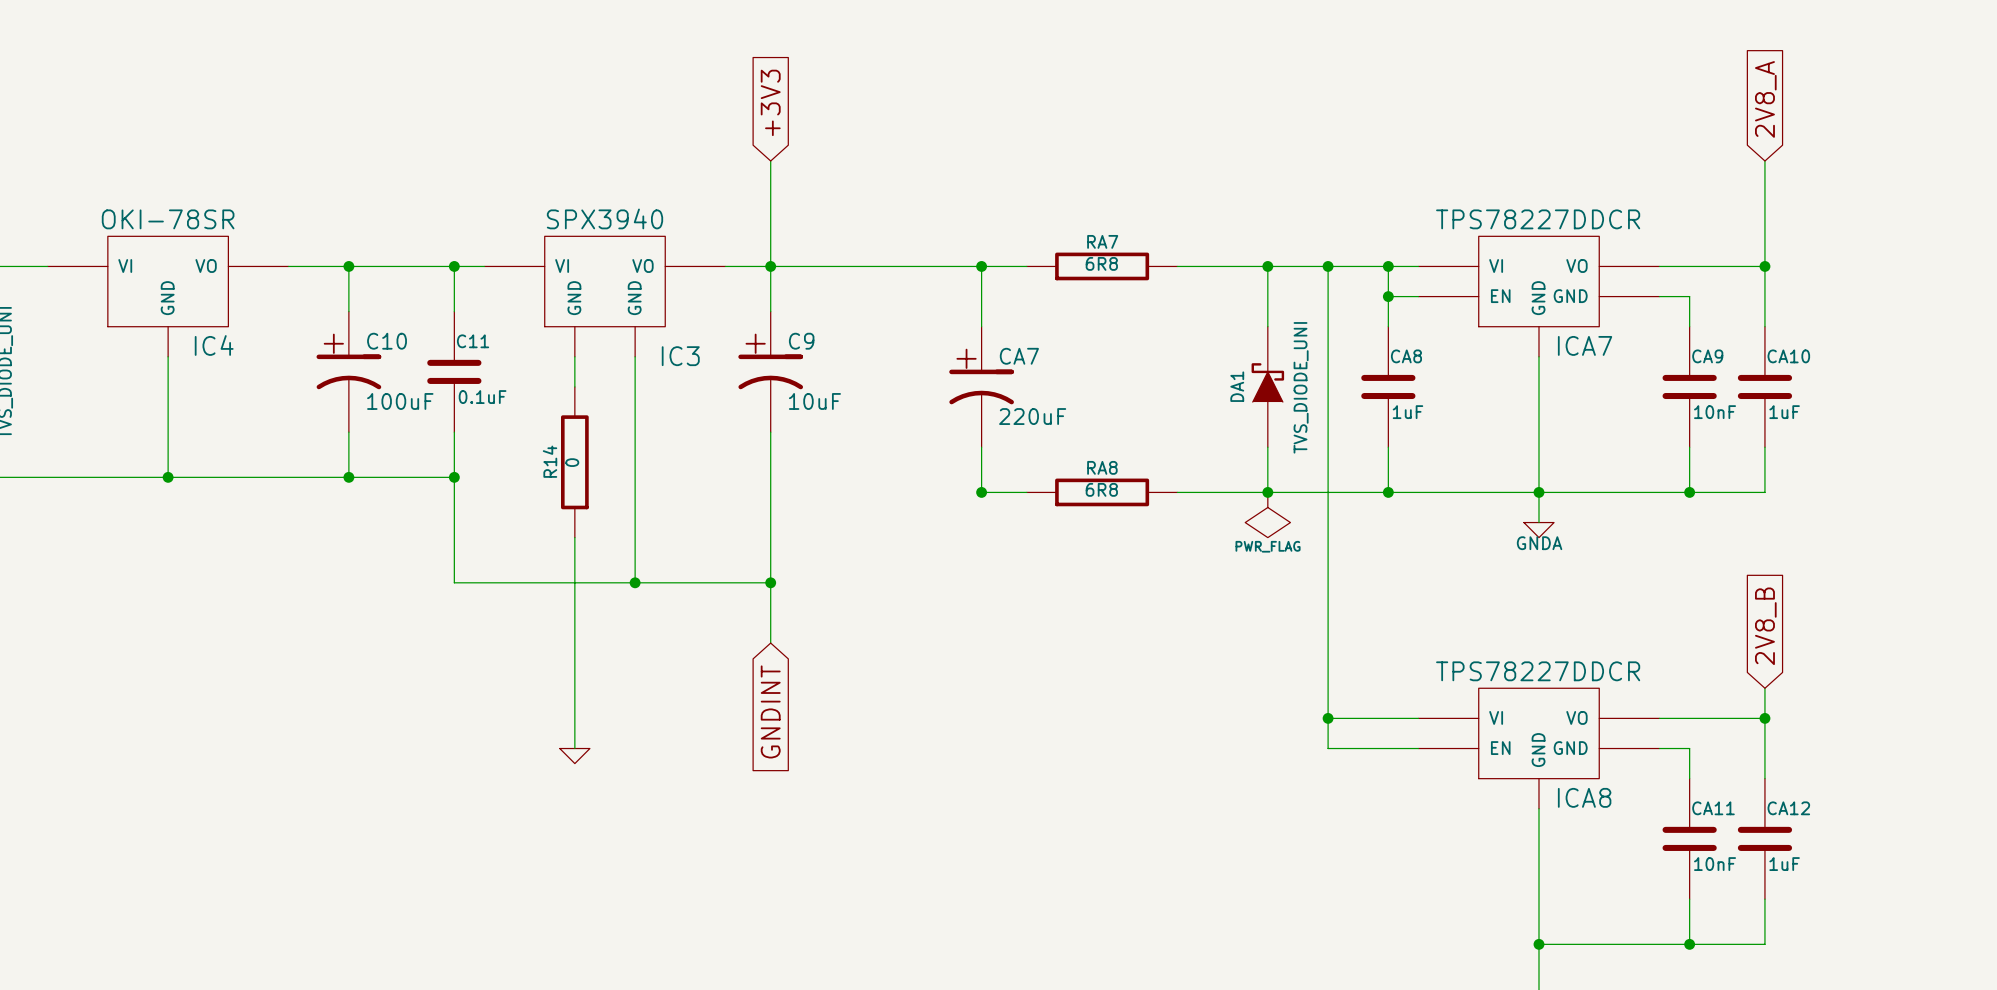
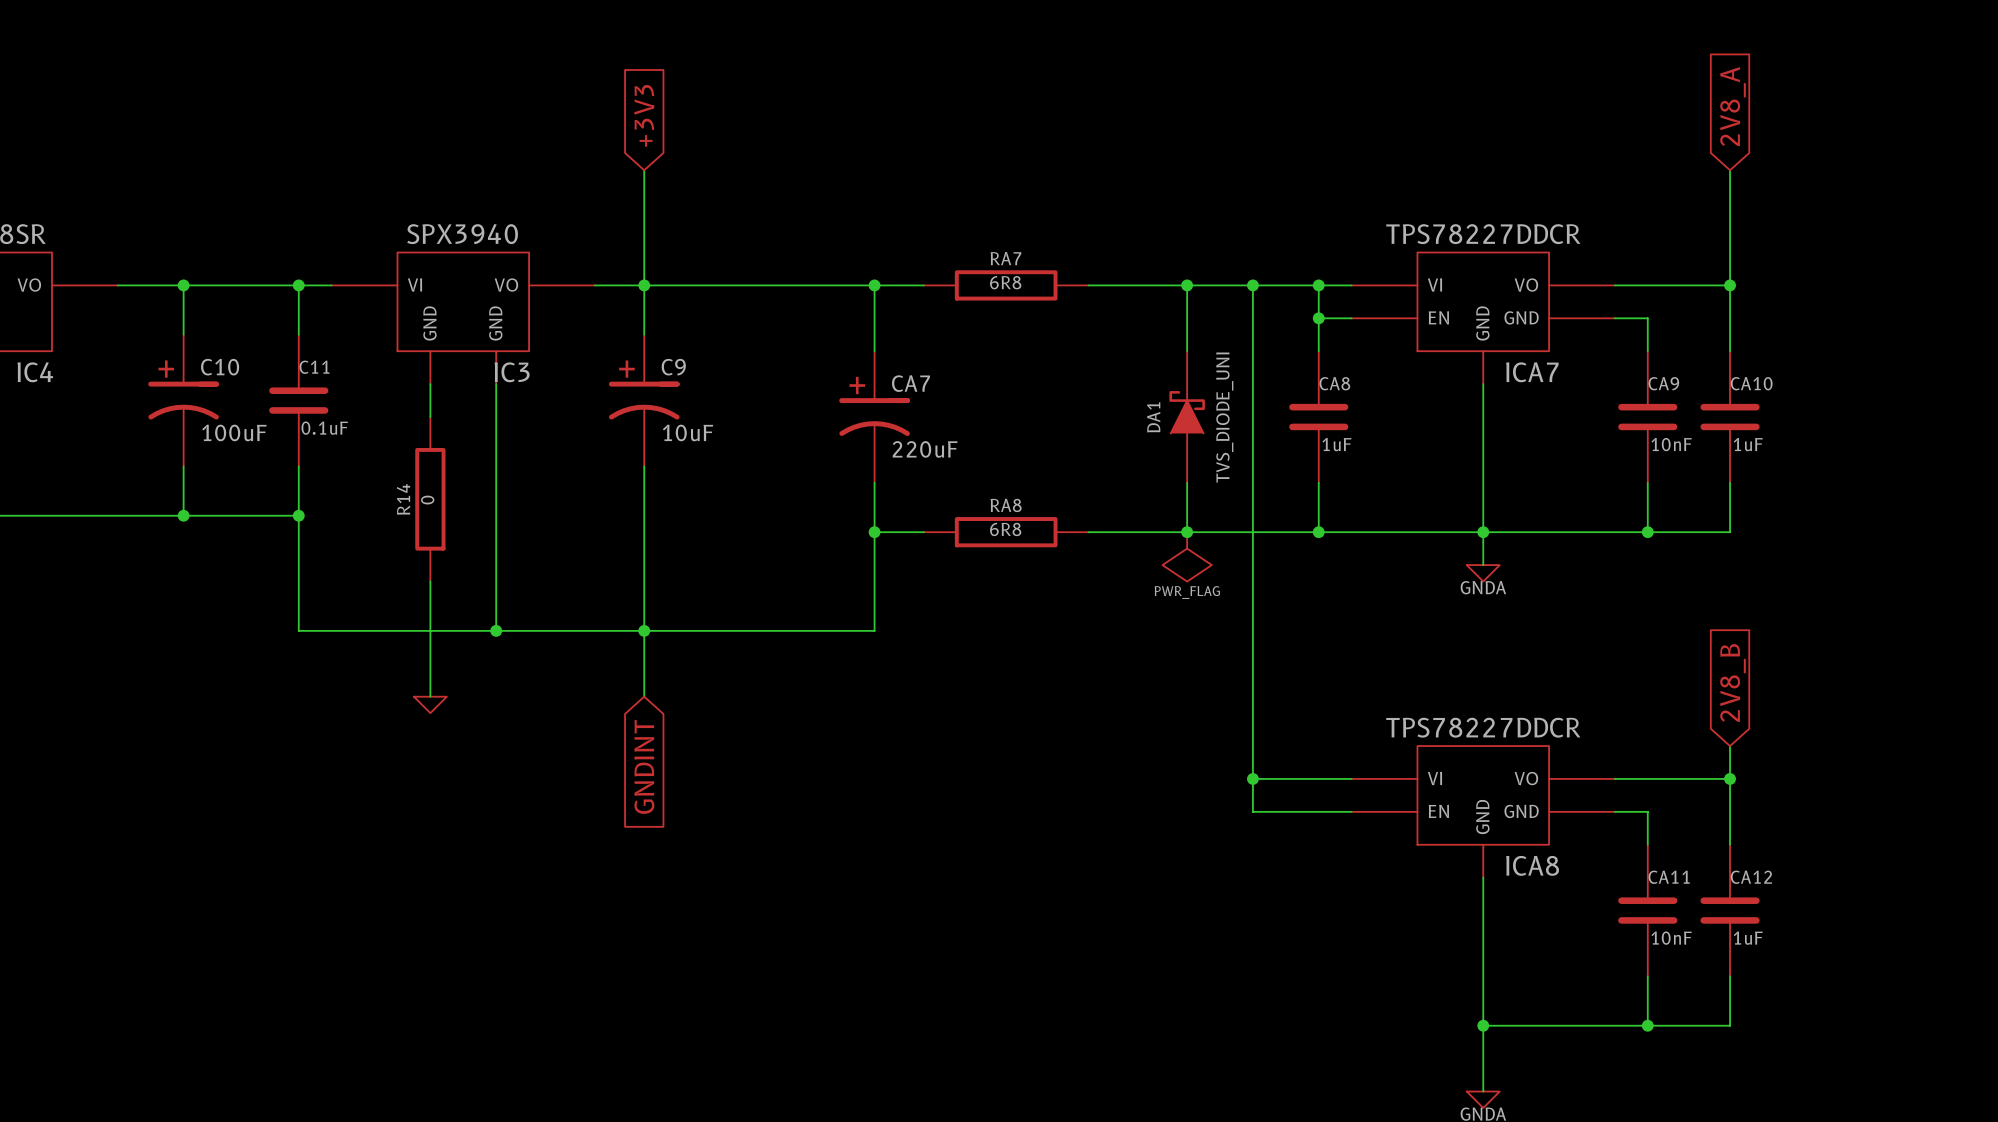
IC3 name position: IC3 (680, 356) -> IC3 (512, 372)
wire: none -> (874, 532) (874, 630) (644, 630)
wire: (574, 643) (574, 748) -> none
power symbol position: (574, 756) -> (430, 704)

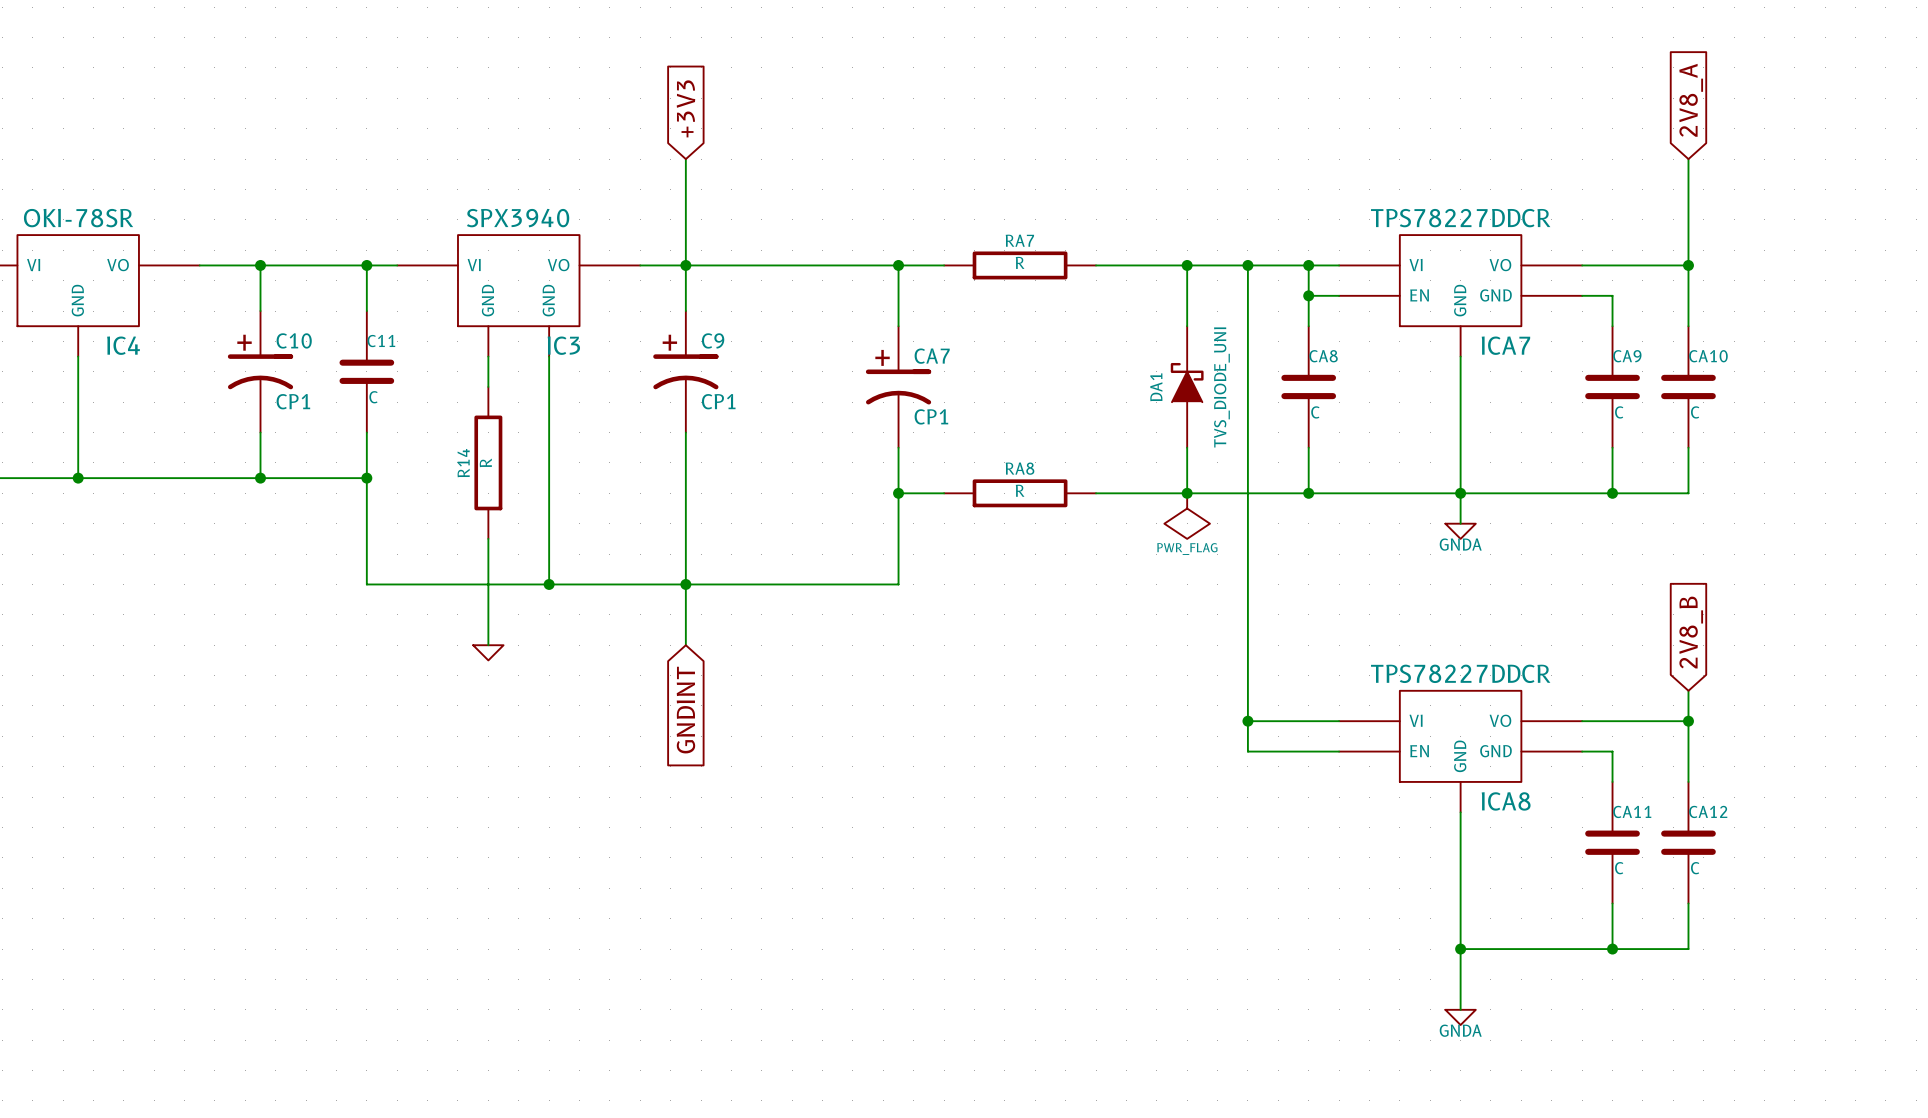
RA7 value: 6R8 (1005, 282) -> R (1020, 262)
C11 value: 0.1uF (324, 428) -> C (373, 397)
C10 value: 100uF (234, 432) -> CP1 (293, 401)
C9 value: 10uF (687, 432) -> CP1 (718, 401)
CA8 value: 1uF (1336, 444) -> C (1315, 412)
CA9 value: 10nF (1671, 444) -> C (1619, 412)
CA10 value: 1uF (1748, 444) -> C (1695, 412)
CA7 value: 220uF (925, 449) -> CP1 (931, 416)
R14 value: 0 (427, 500) -> R (485, 462)
RA8 value: 6R8 (1005, 529) -> R (1020, 490)
CA11 value: 10nF (1671, 938) -> C (1619, 868)
CA12 value: 1uF (1748, 938) -> C (1695, 868)

